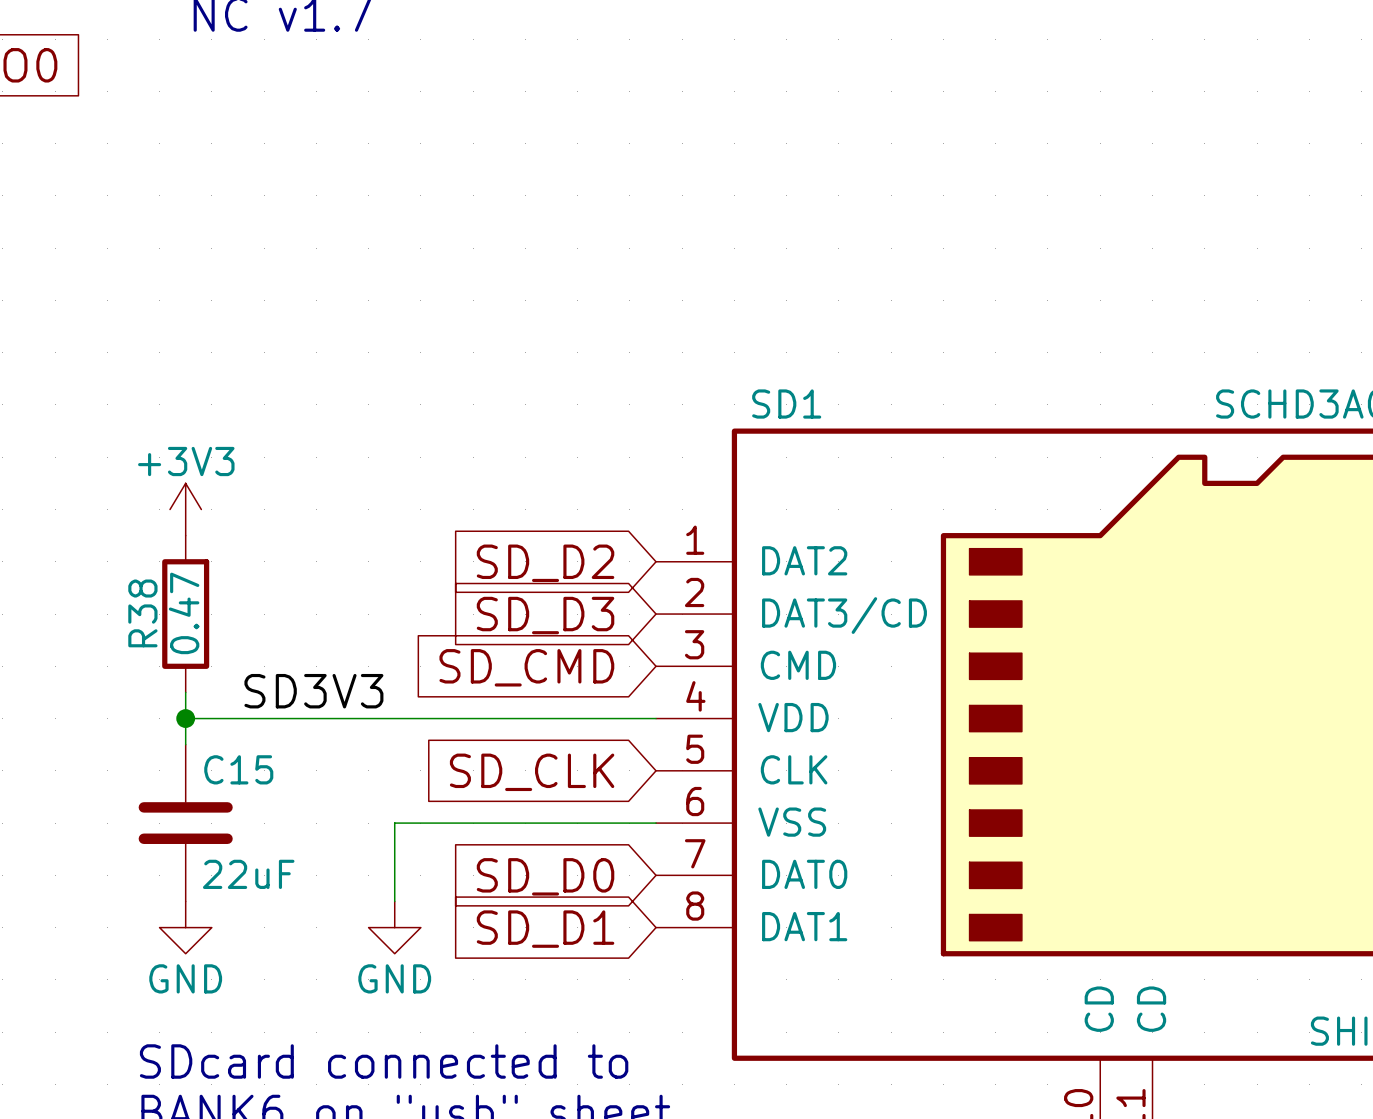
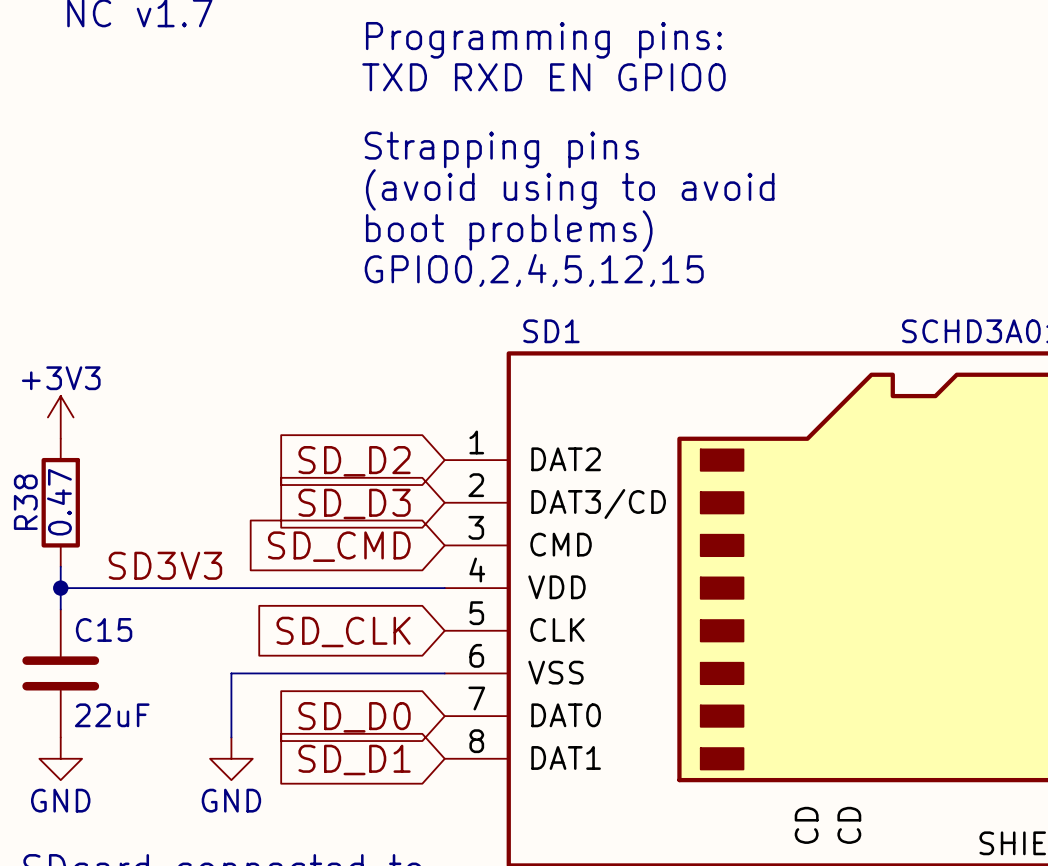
text: none -> Programming pins: (543, 40)
text: none -> TXD RXD EN GPIO0 (543, 77)
text: none -> Strapping pins (501, 149)
text: none -> (avoid using to avoid (570, 189)
text: none -> boot problems) (509, 231)
text: none -> GPIO0,2,4,5,12,15 (534, 270)

